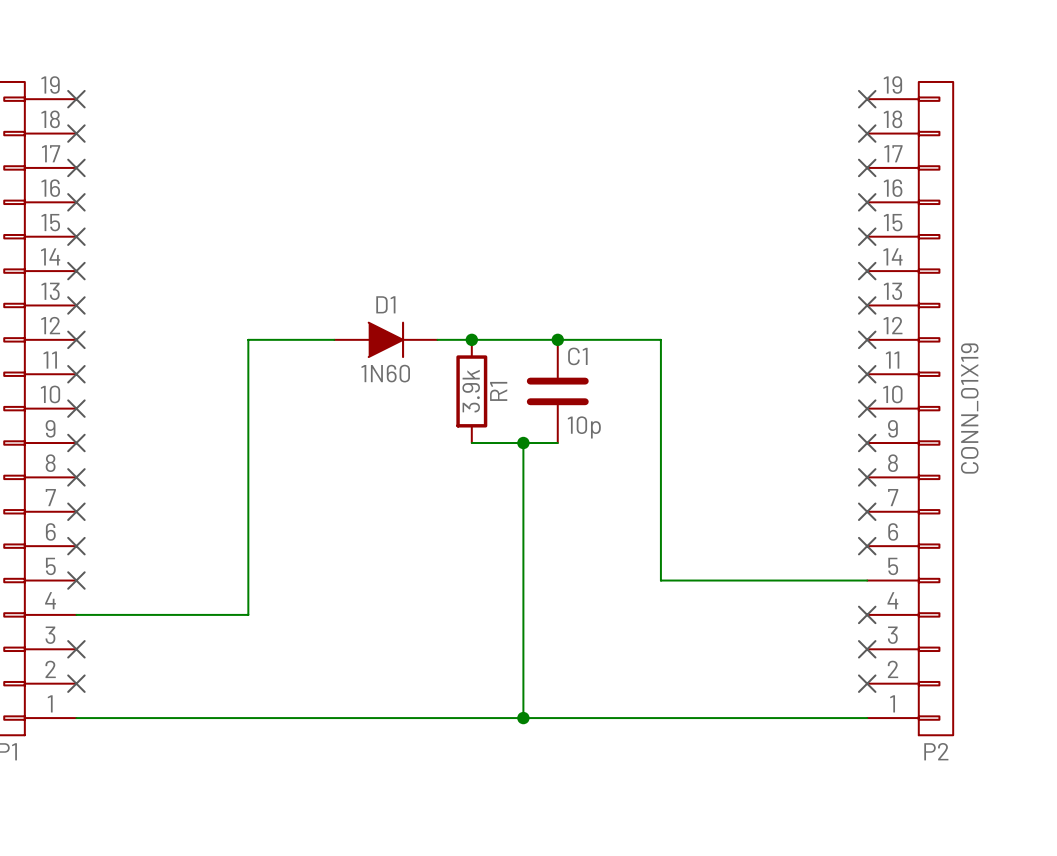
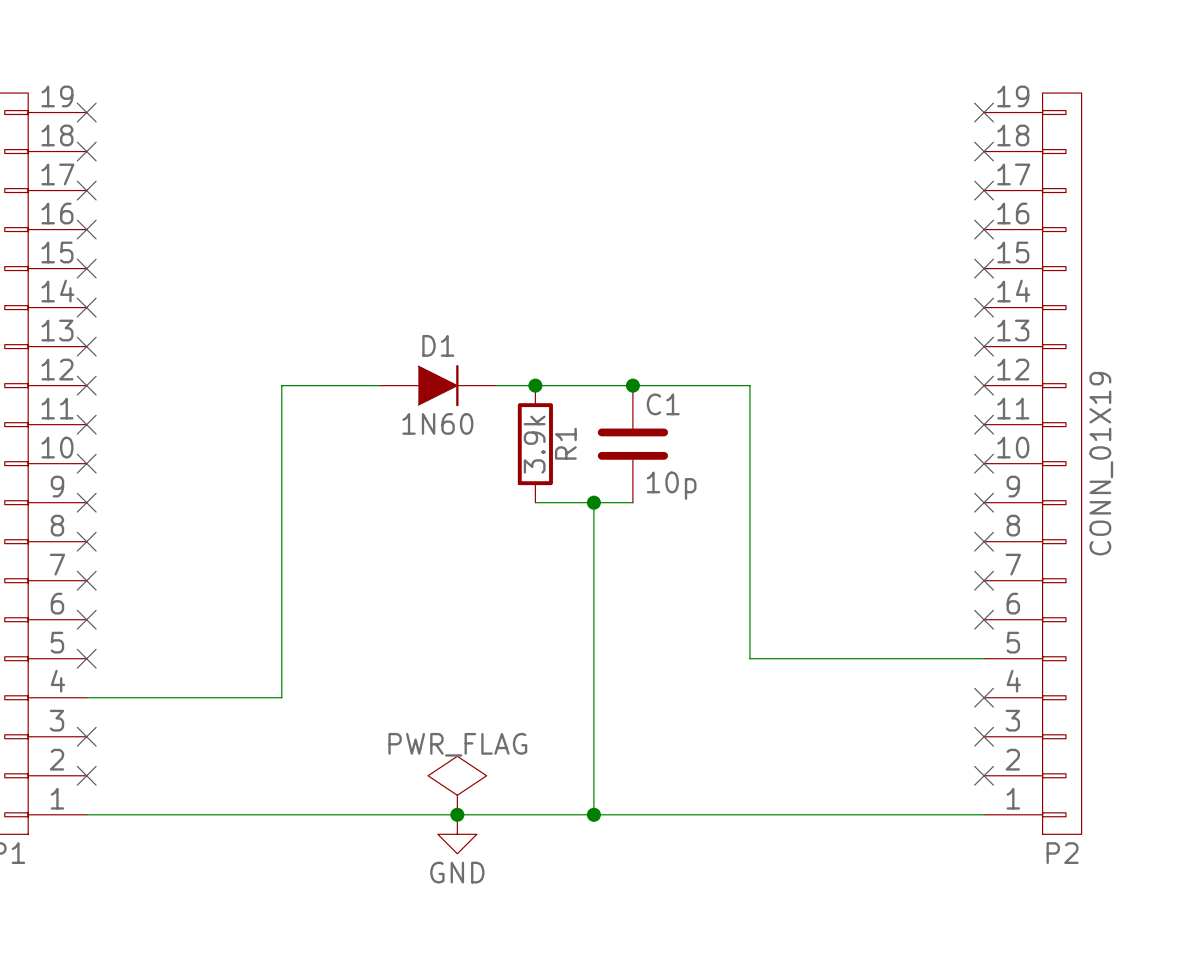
power symbol: none -> PWR_FLAG (457, 785)
junction: none -> (457, 814)
power symbol: none -> GND (457, 834)

